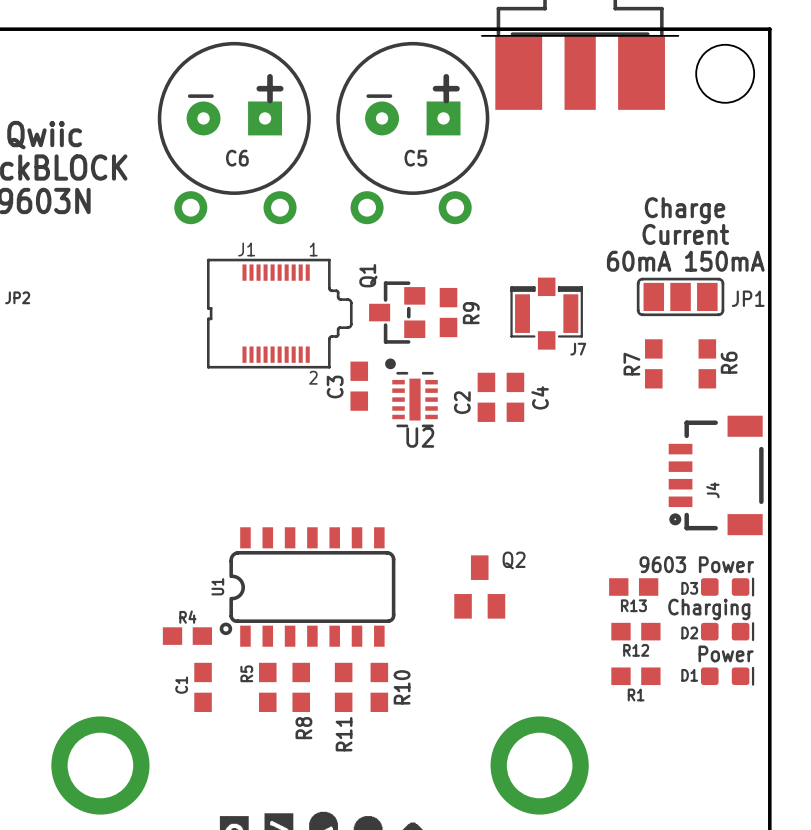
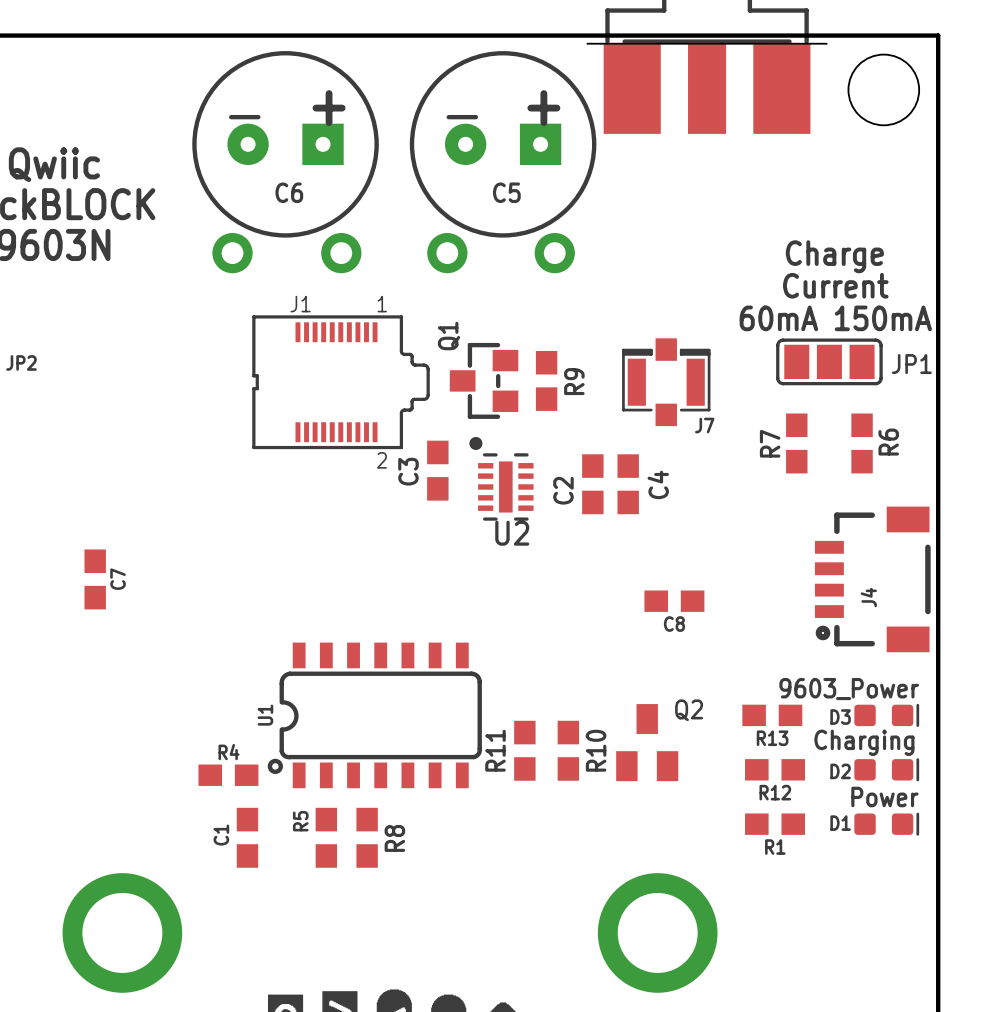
C7: none -> (95, 579)
C8: none -> (674, 601)
text: 9603 Power (696, 564) -> 9603_Power (849, 689)
Q2 position: (479, 587) -> (647, 742)
R11 position: (343, 687) -> (524, 750)
R10 position: (379, 687) -> (568, 750)
R8 name position: R8 (303, 728) -> R8 (394, 838)
R11 name position: R11 (344, 734) -> R11 (495, 750)

